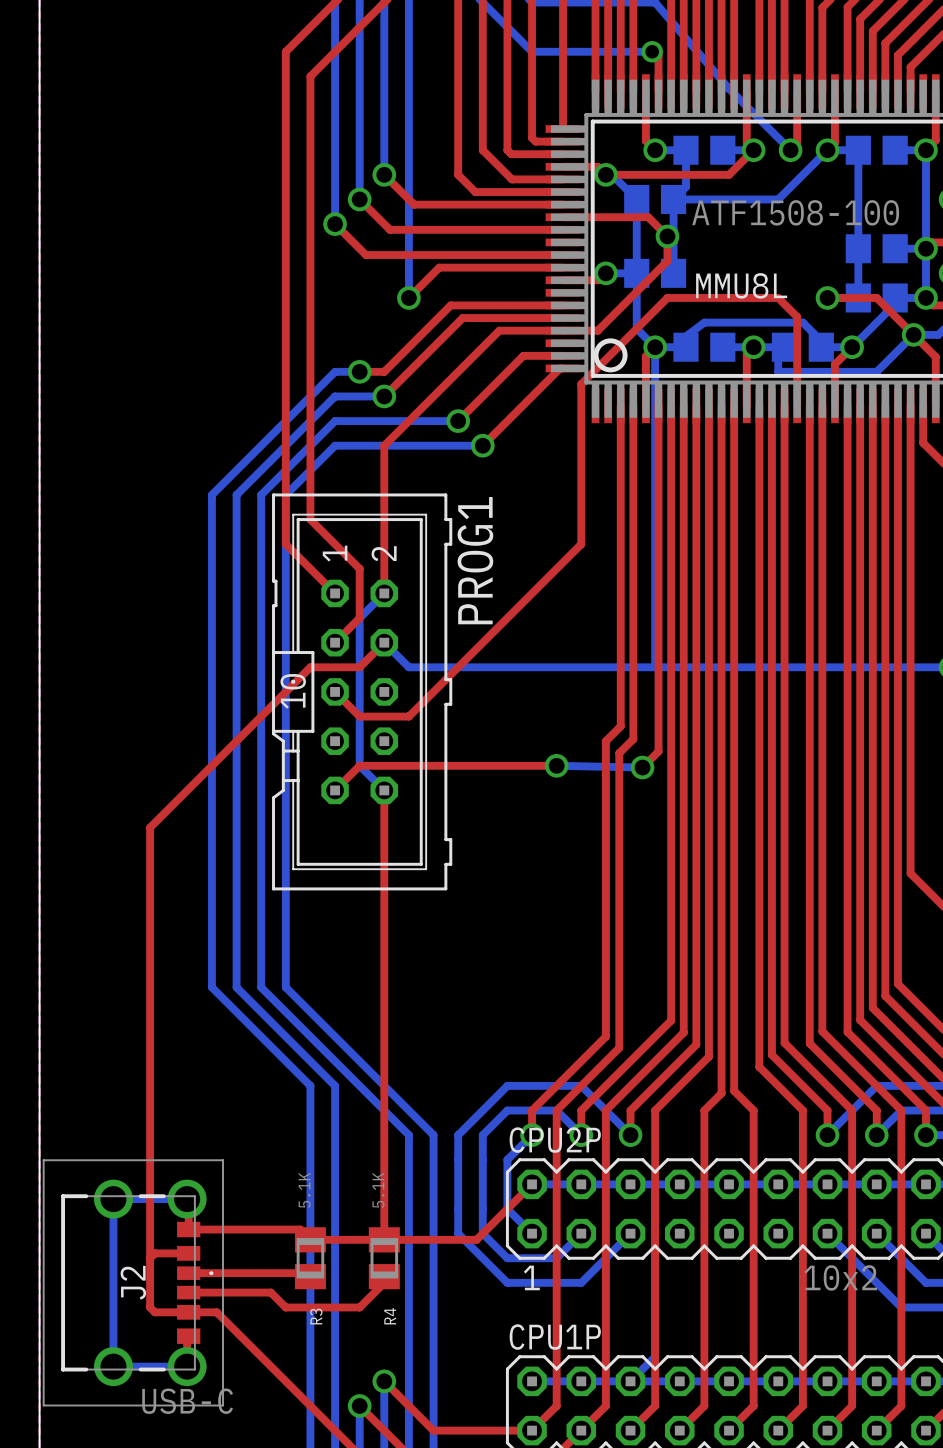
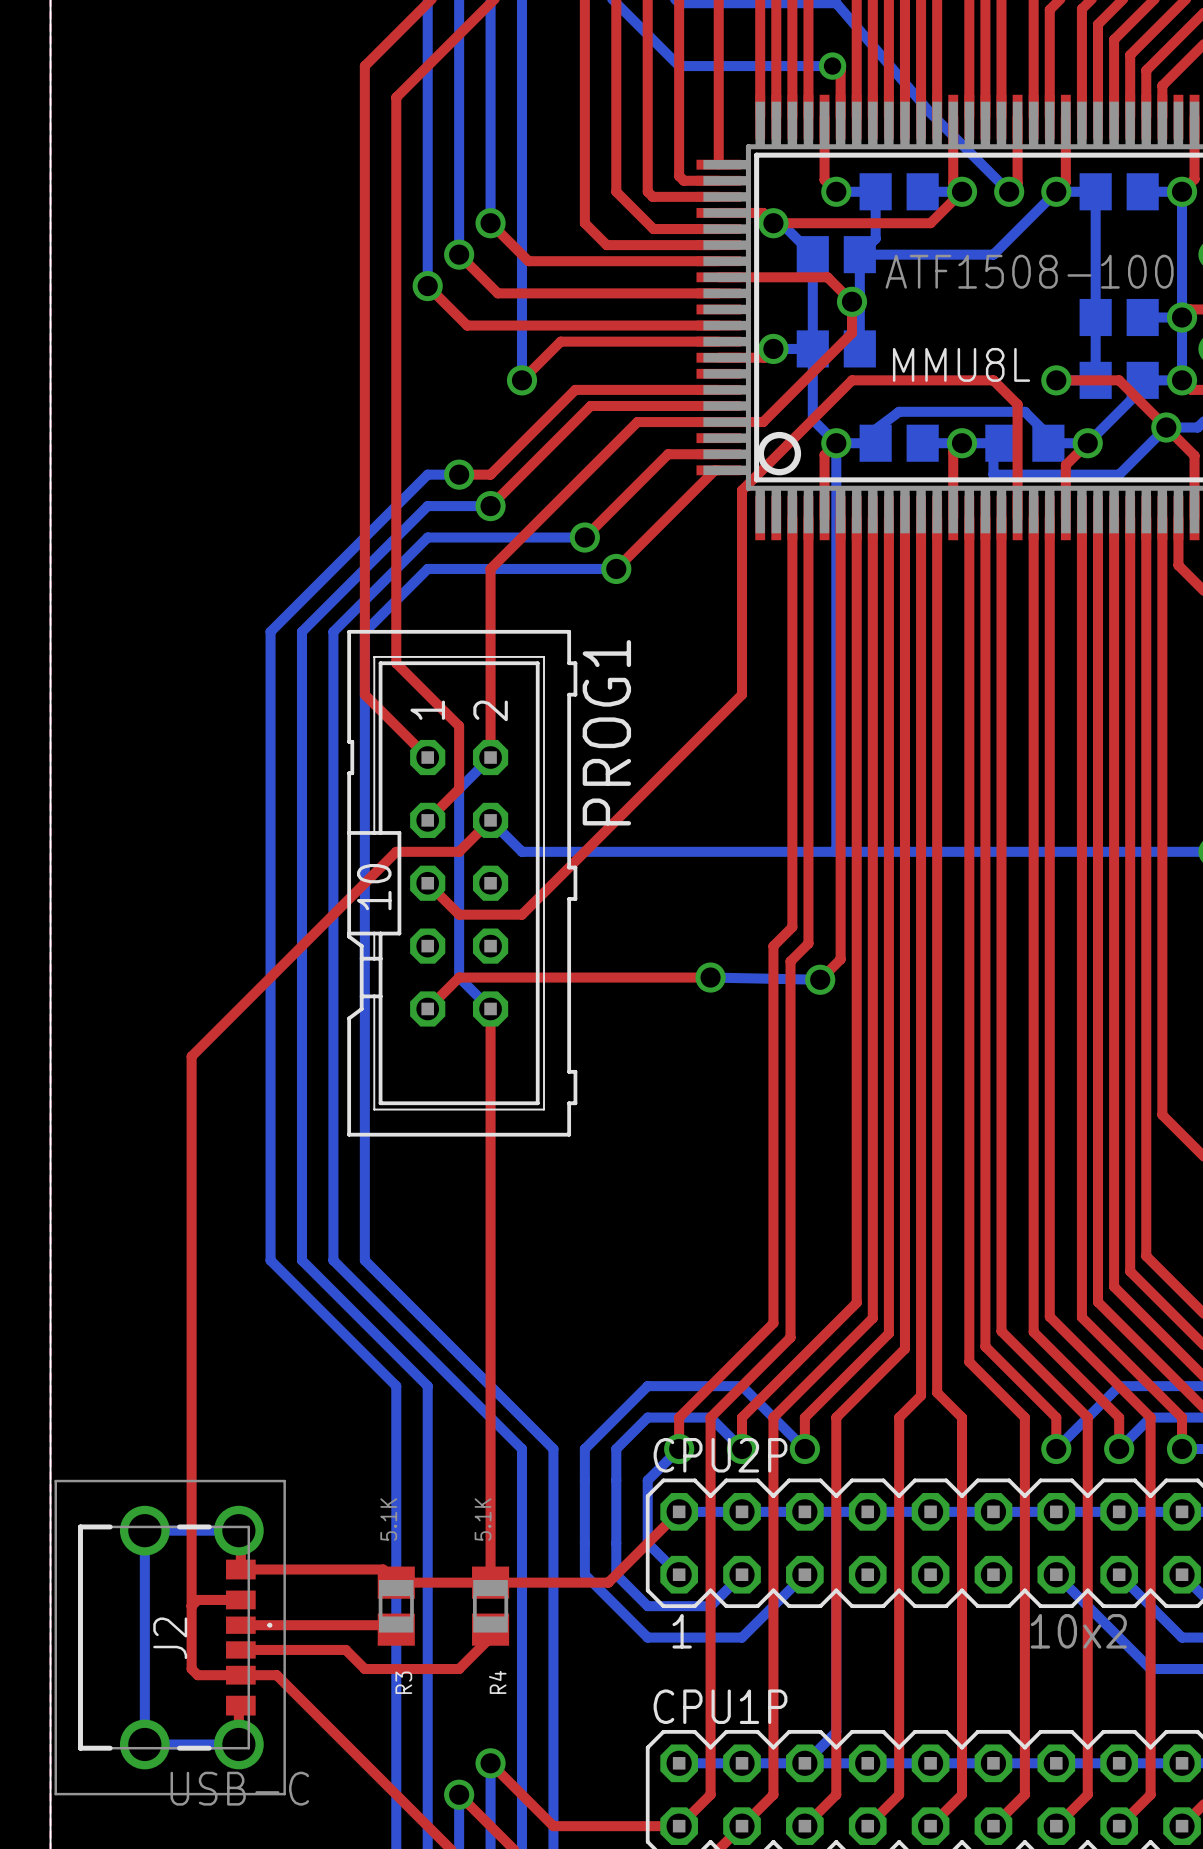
R3 footprint: [294, 1227, 326, 1290] -> [377, 1566, 415, 1646]
R4 footprint: [368, 1227, 400, 1290] -> [472, 1566, 510, 1646]

